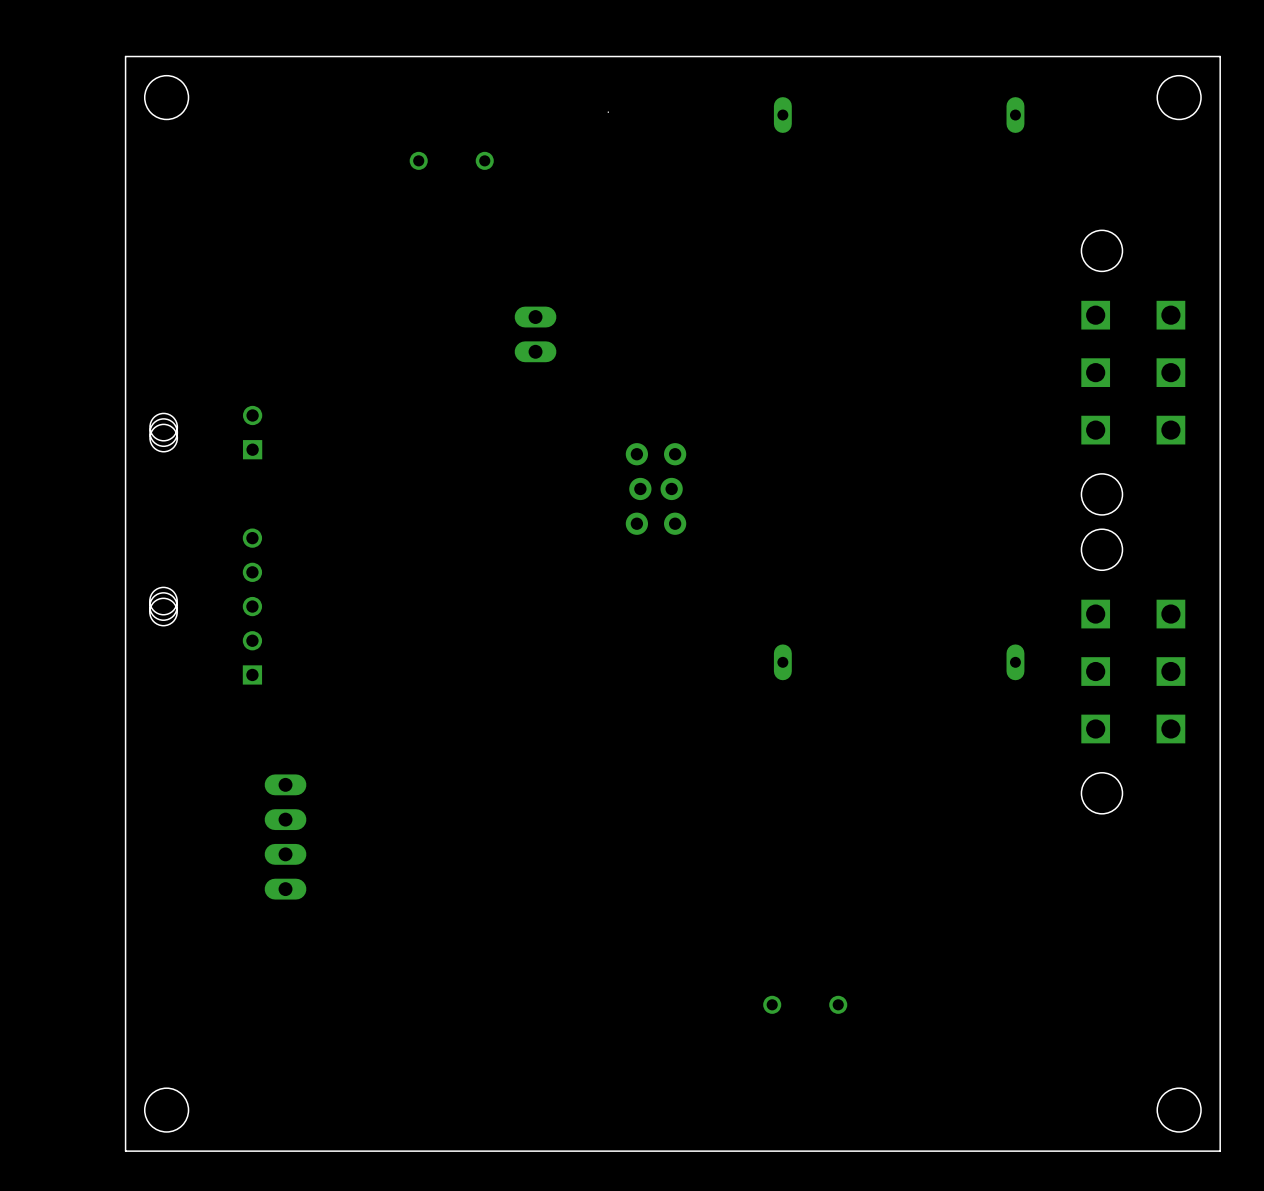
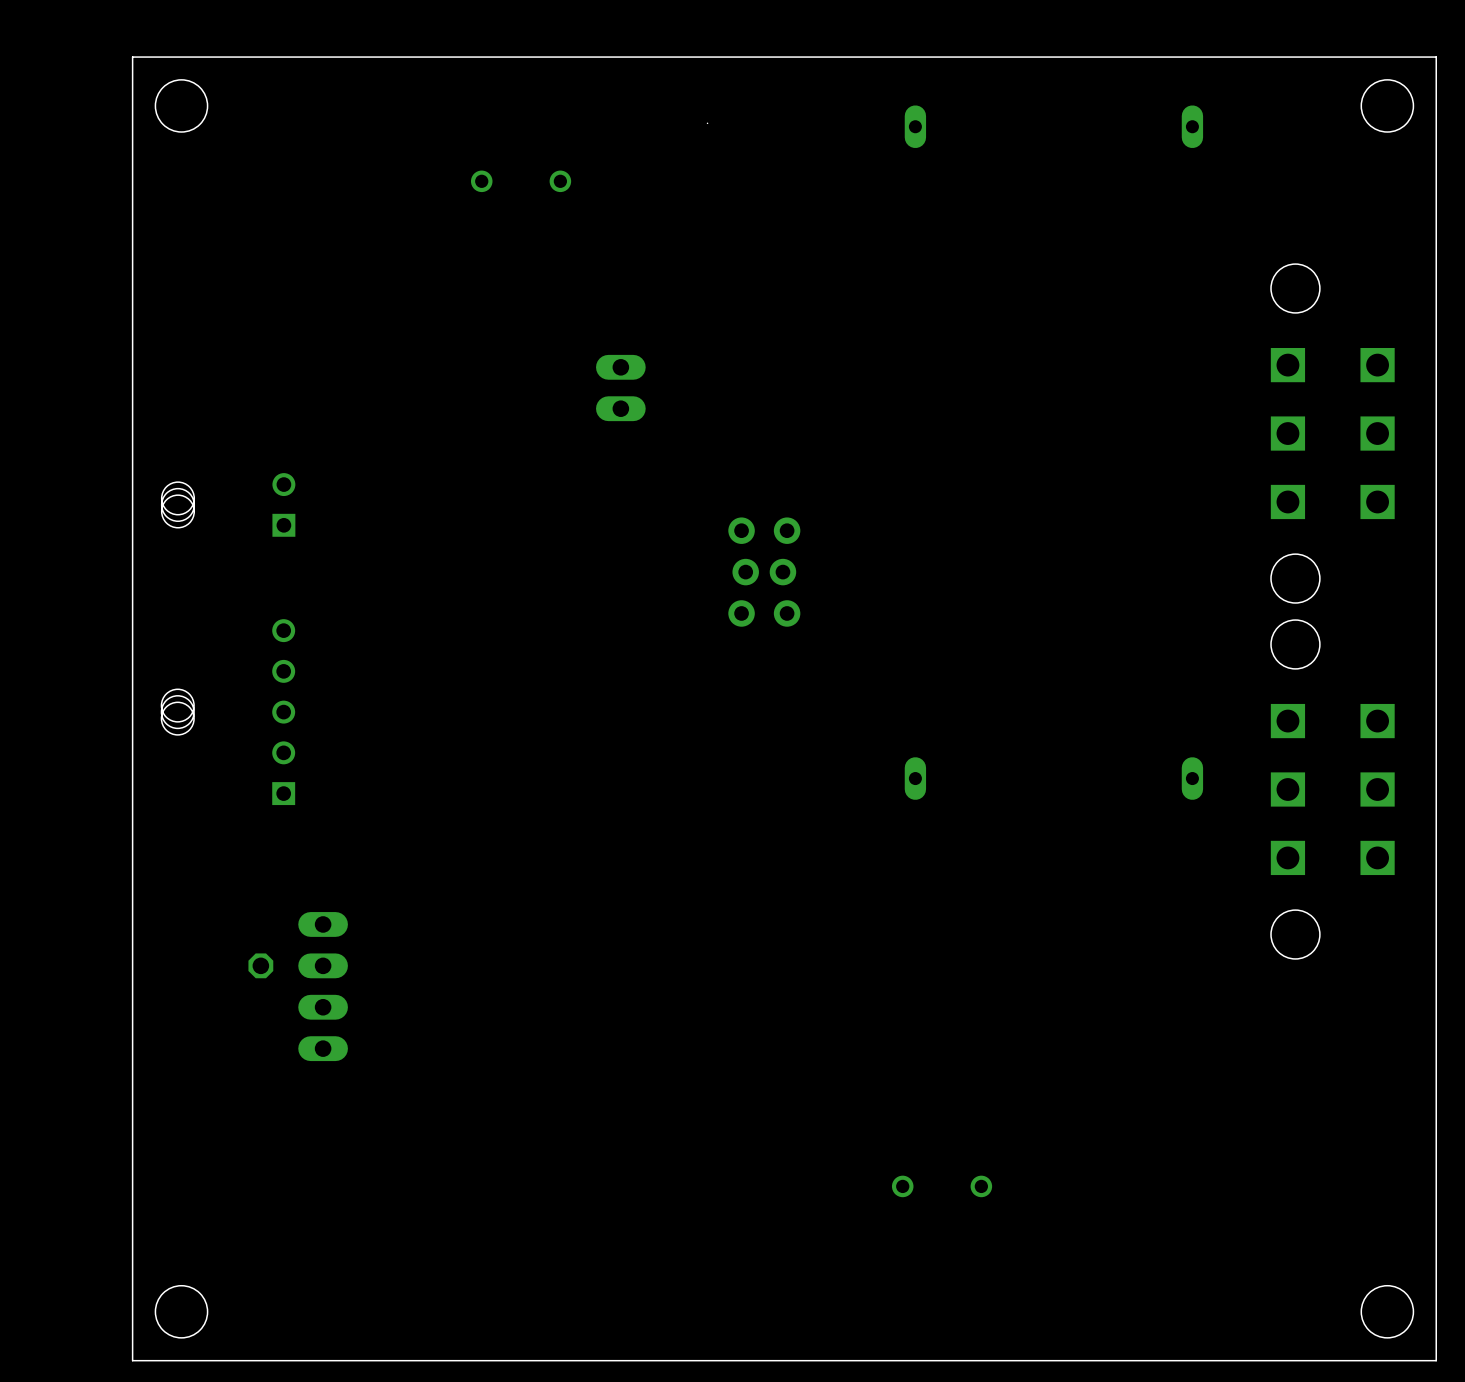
part: none -> (260, 965)

